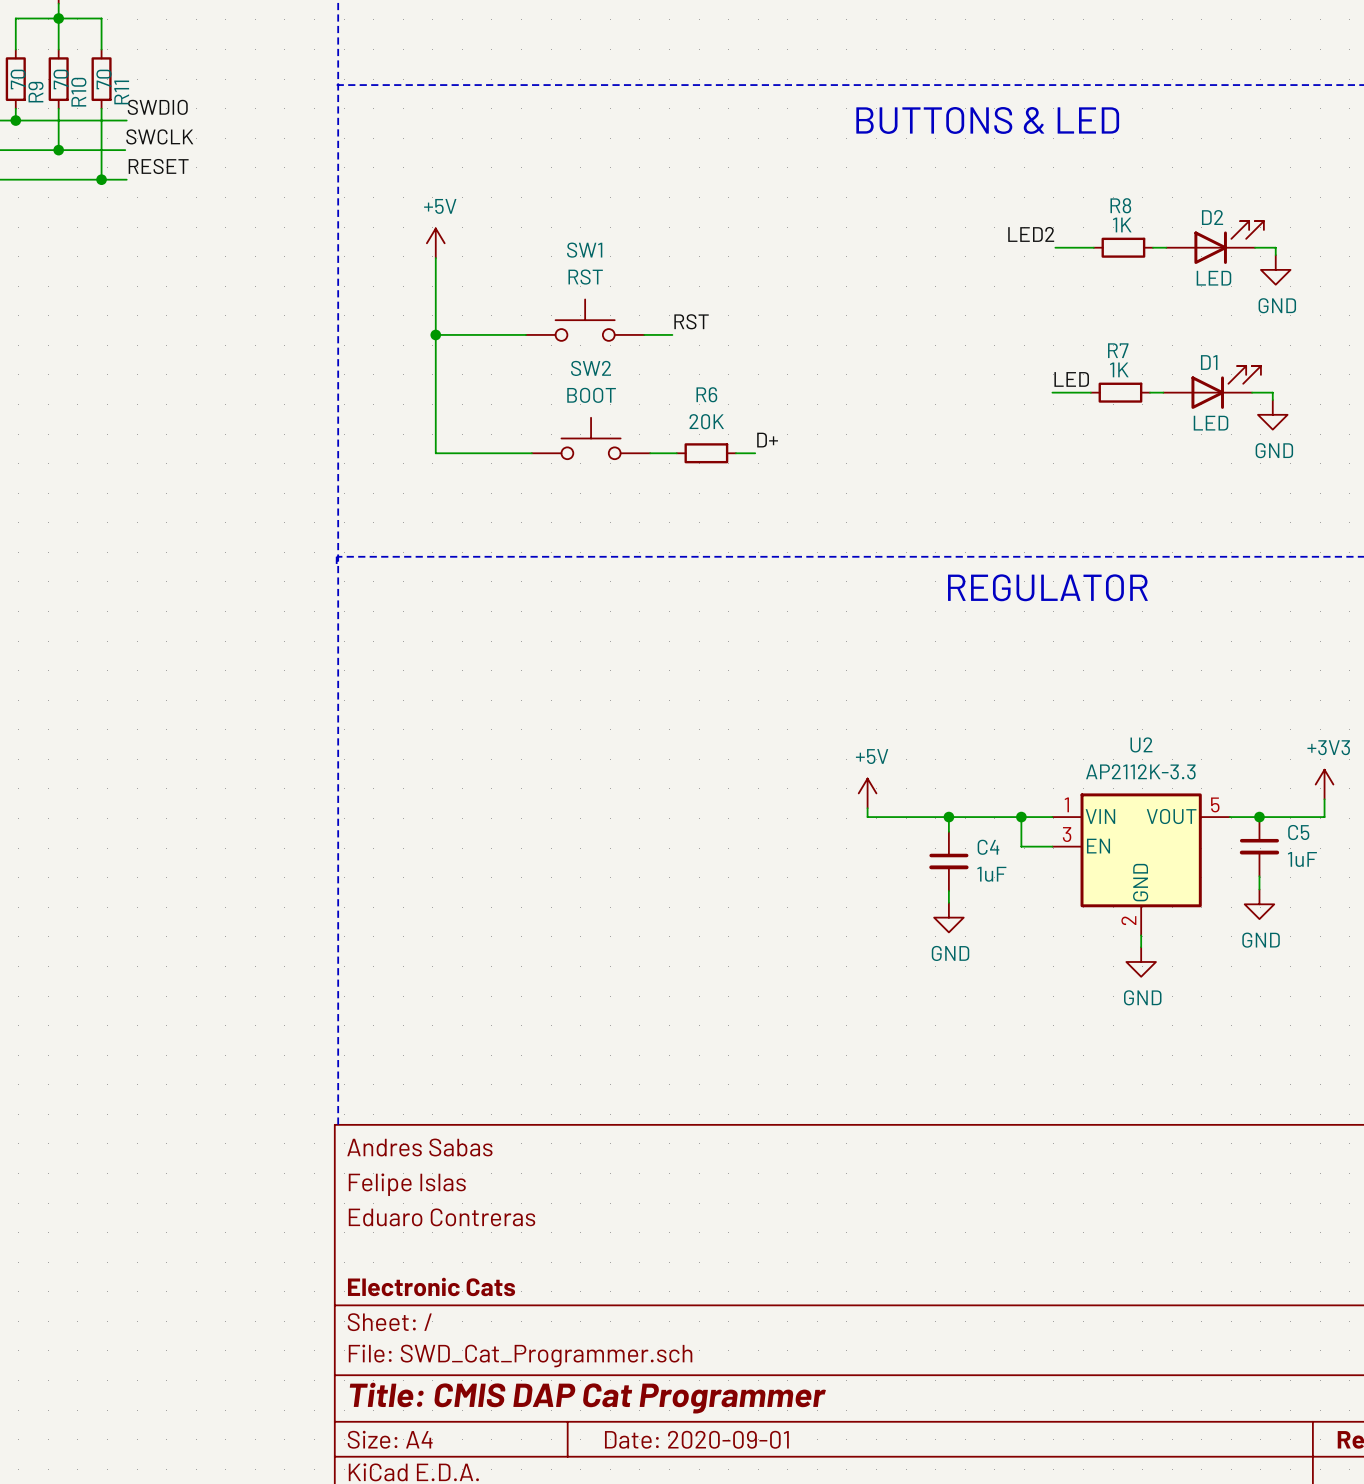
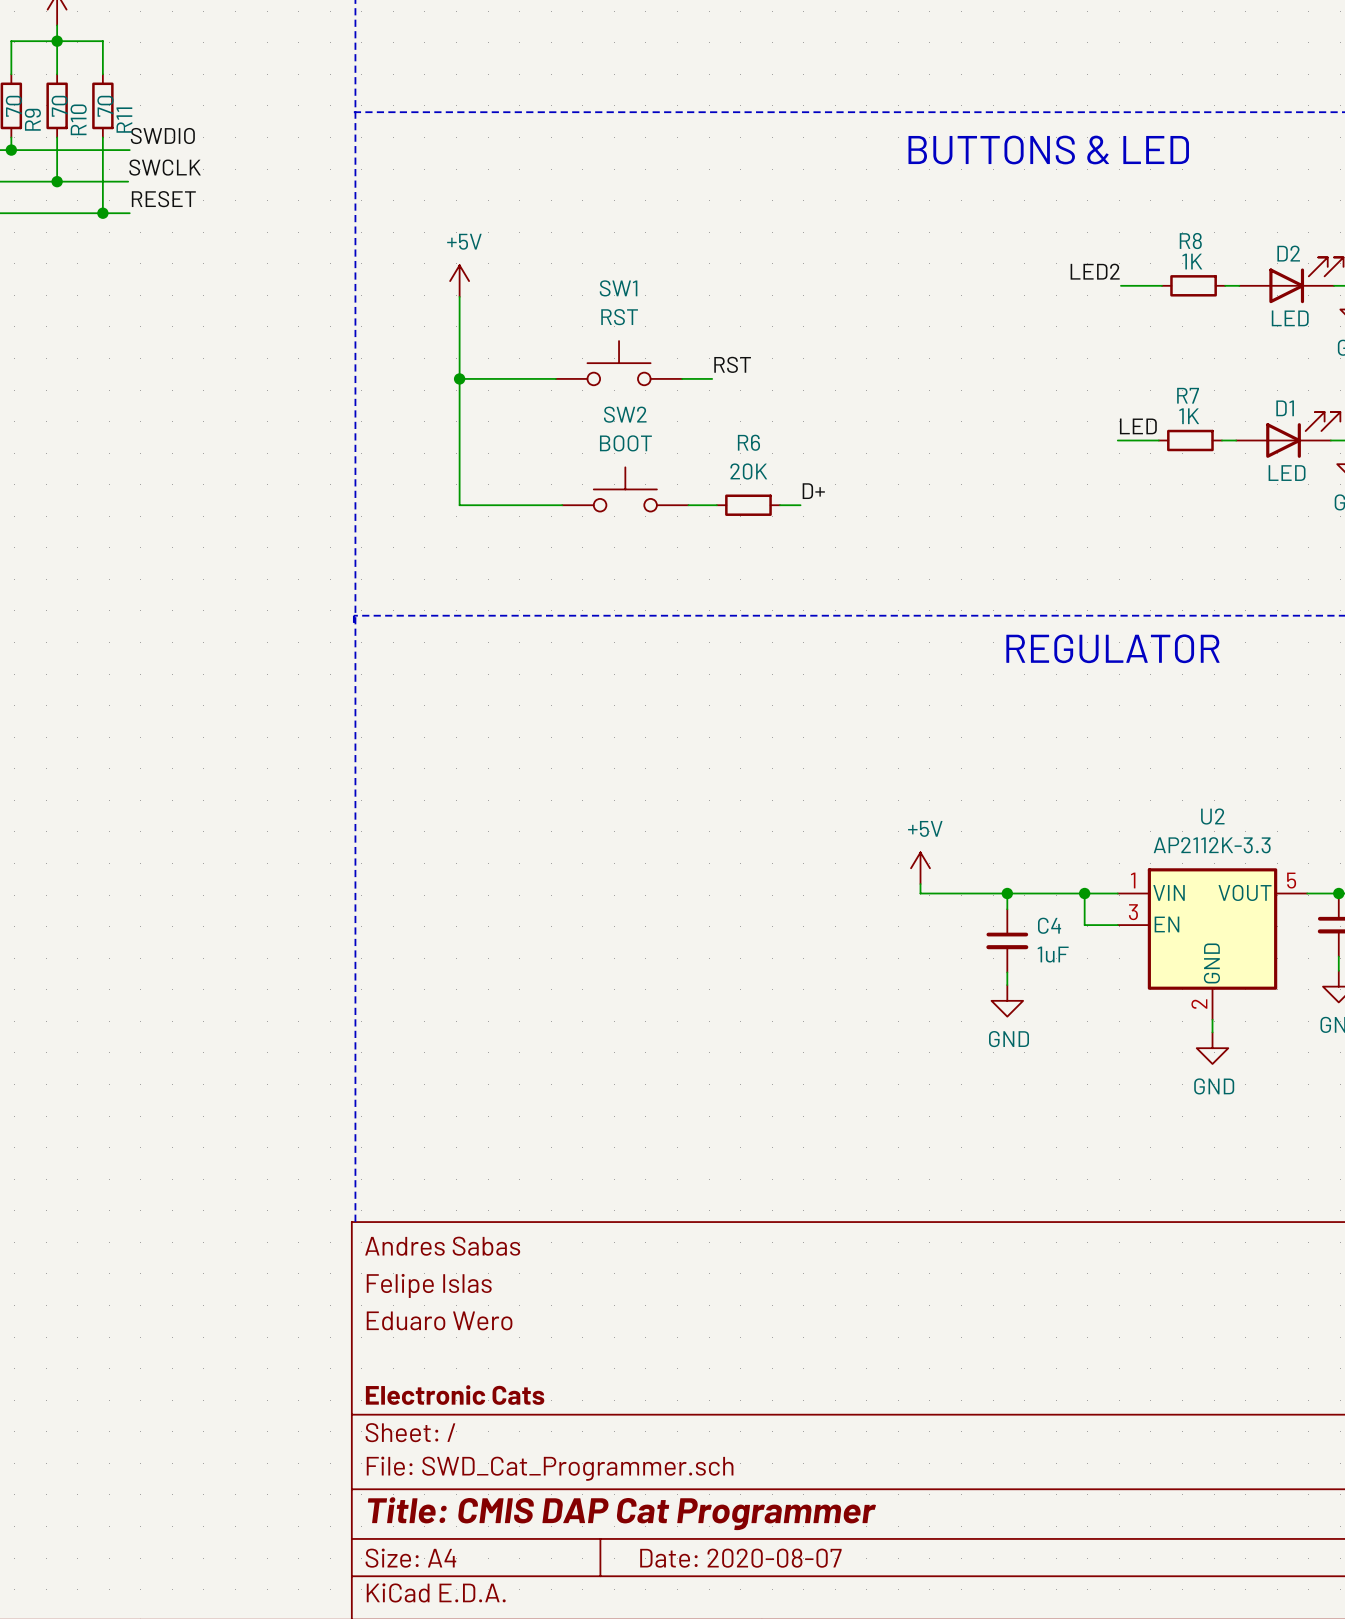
title block: Eduaro Contreras (442, 1217) -> Eduaro Wero (439, 1320)
title block: Date: 2020-09-01 (696, 1439) -> Date: 2020-08-07 (740, 1558)

